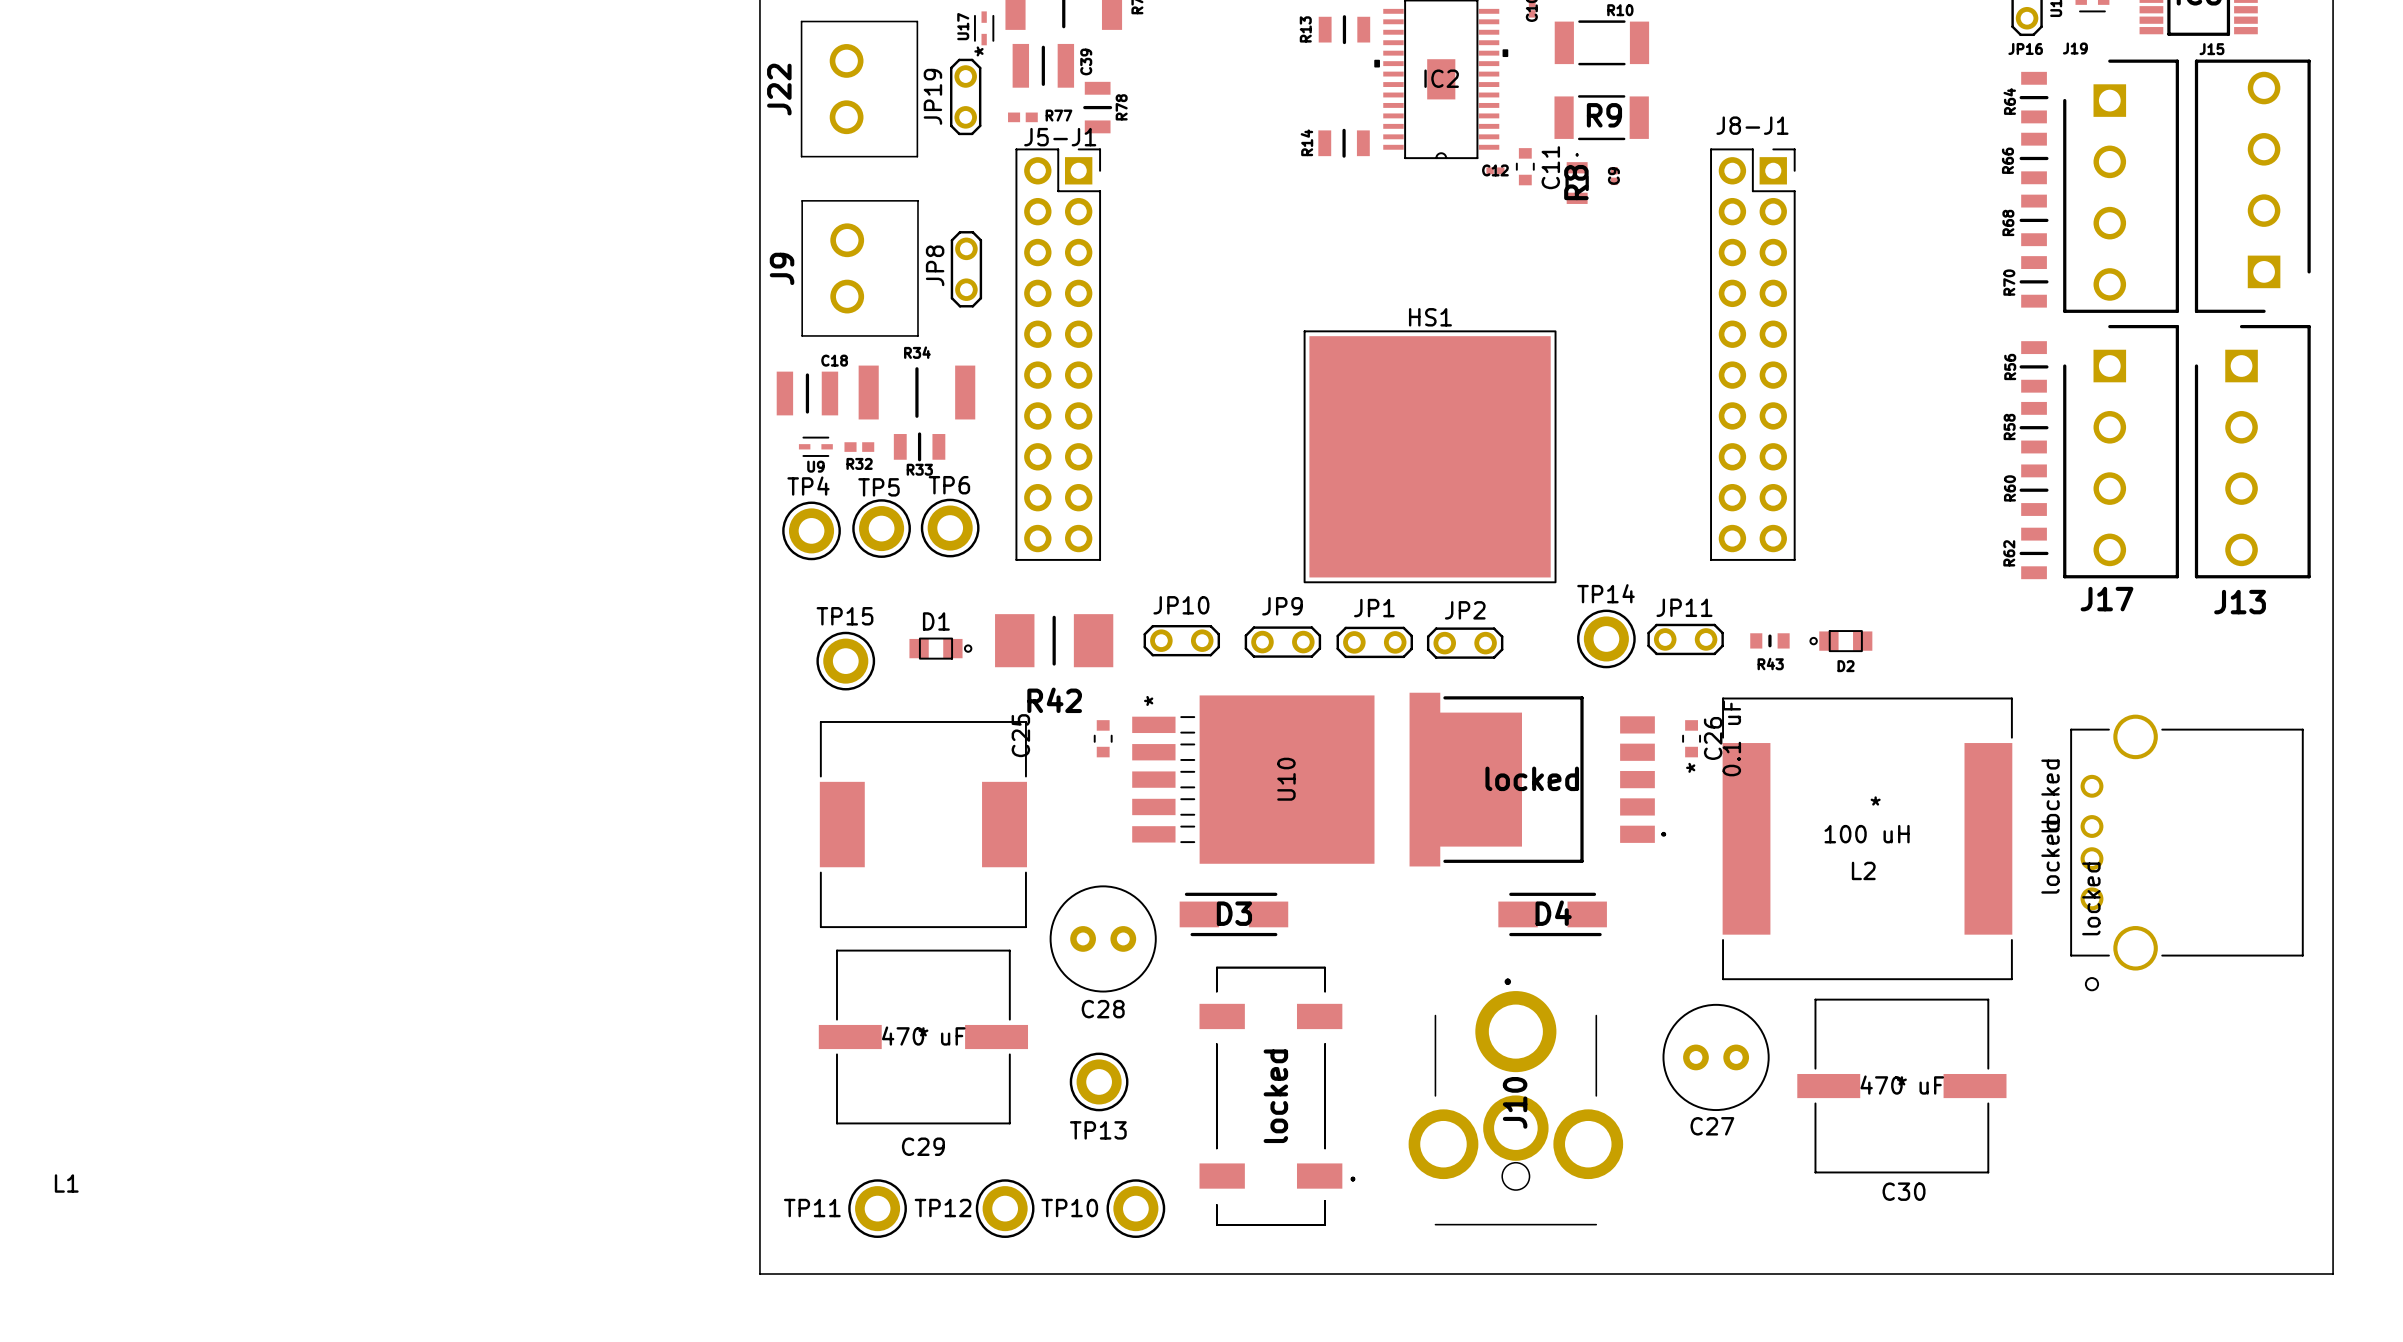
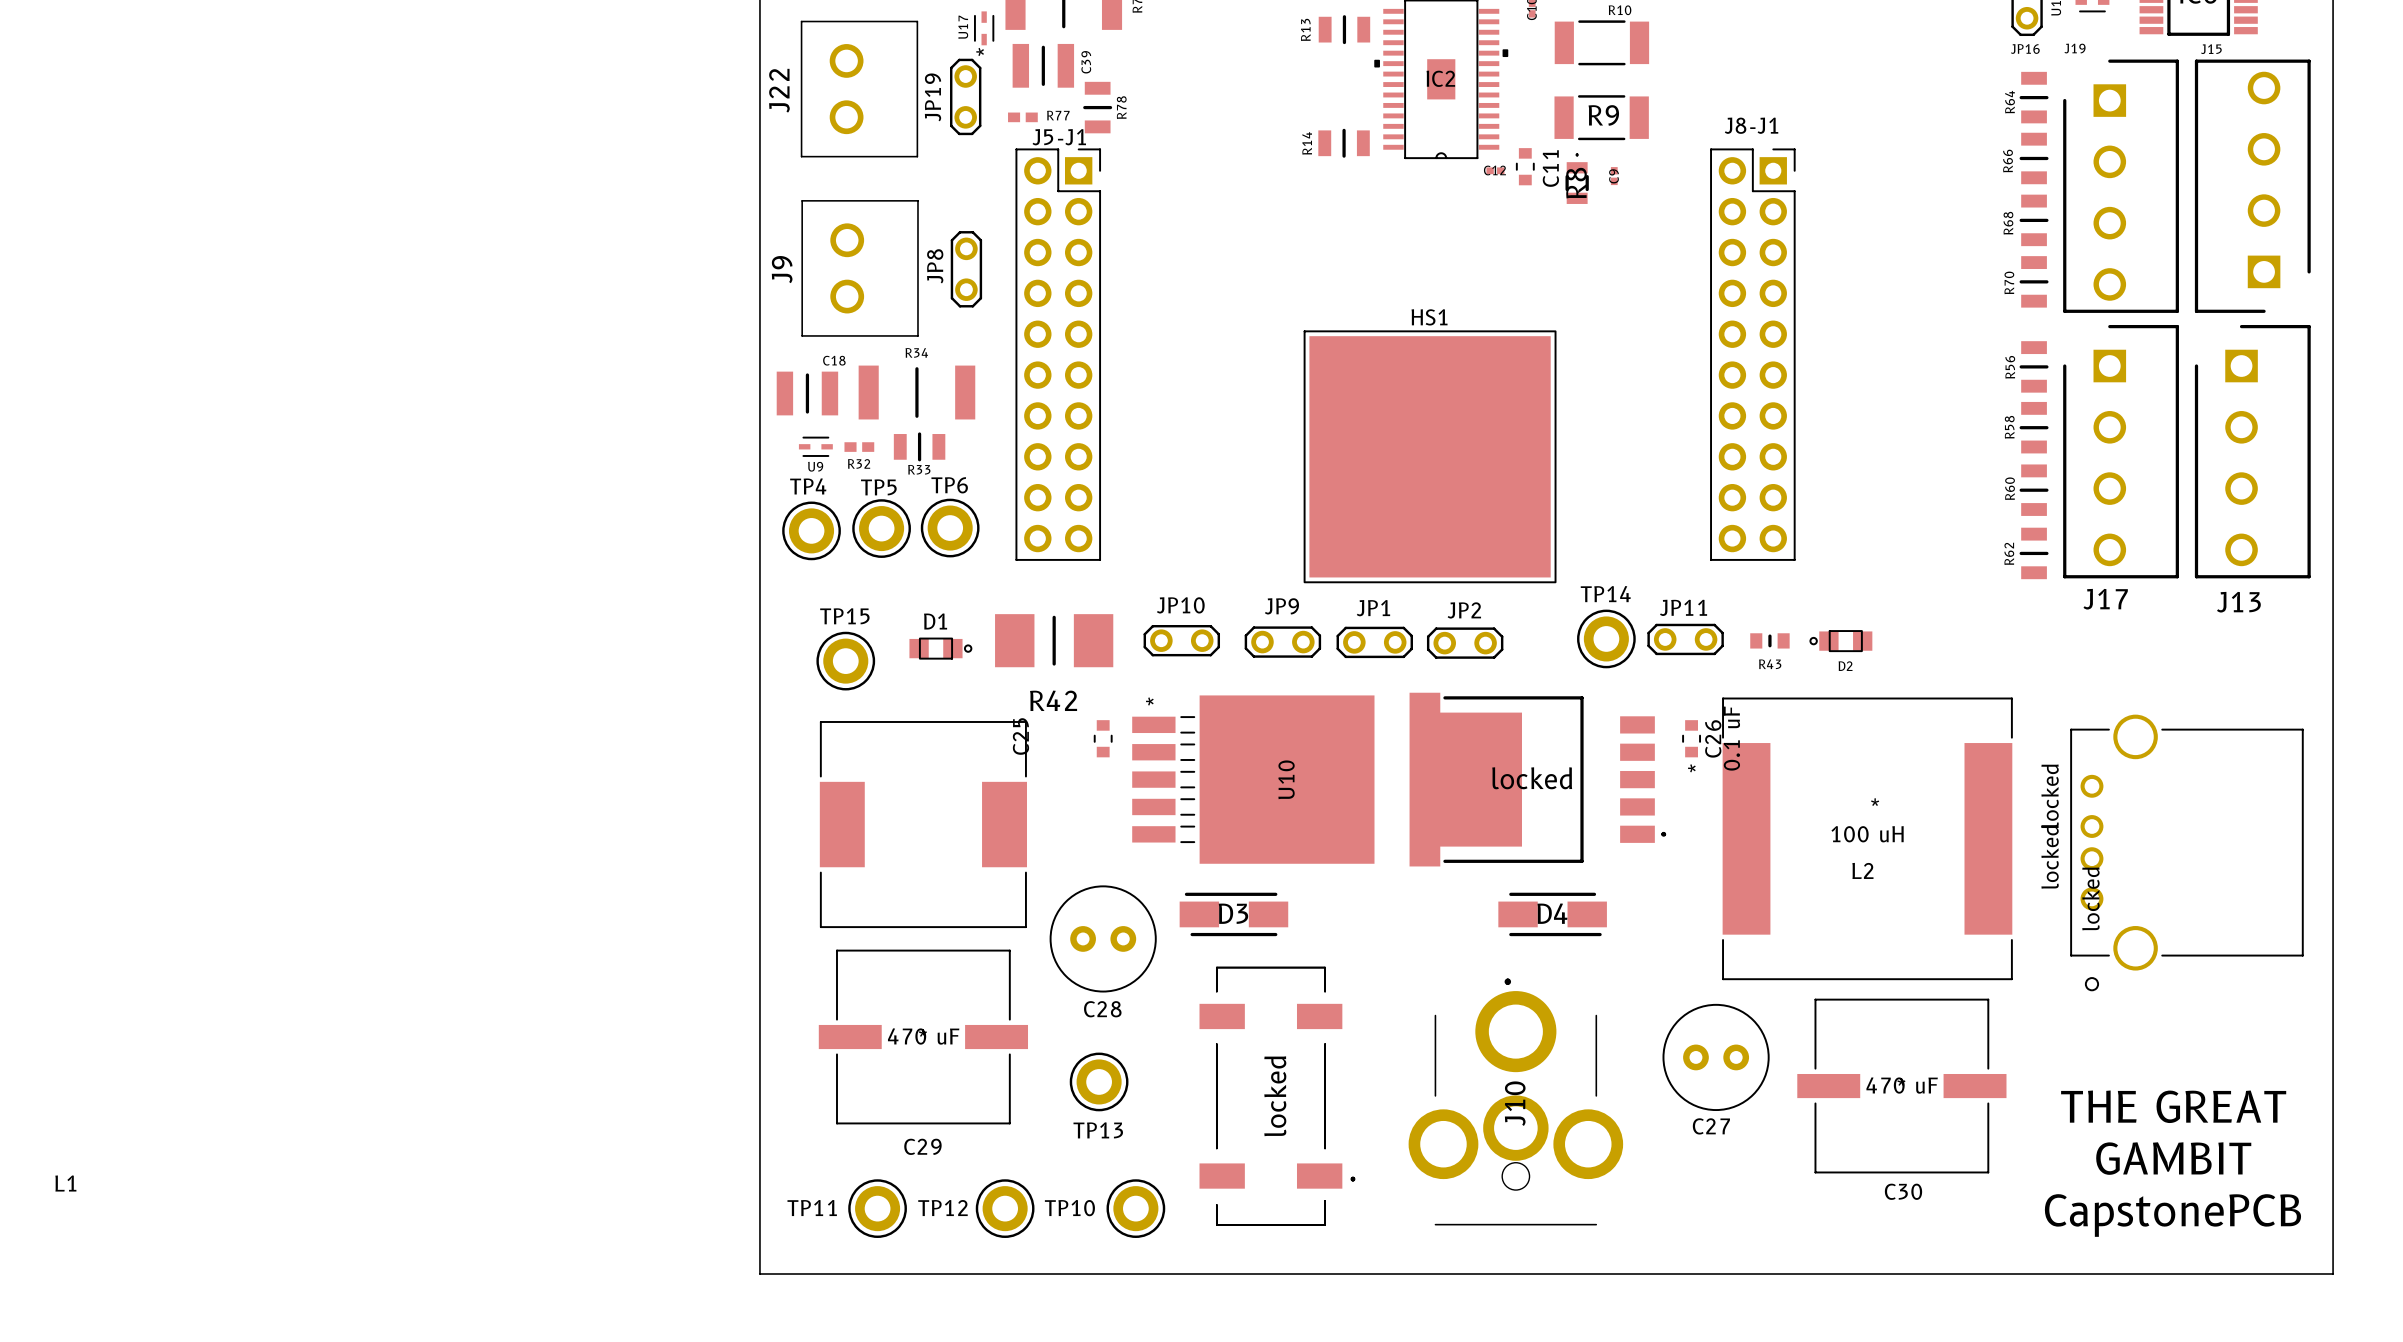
text: none -> THE GREAT (2173, 1106)
text: none -> GAMBIT (2173, 1158)
text: none -> CapstonePCB (2172, 1215)

